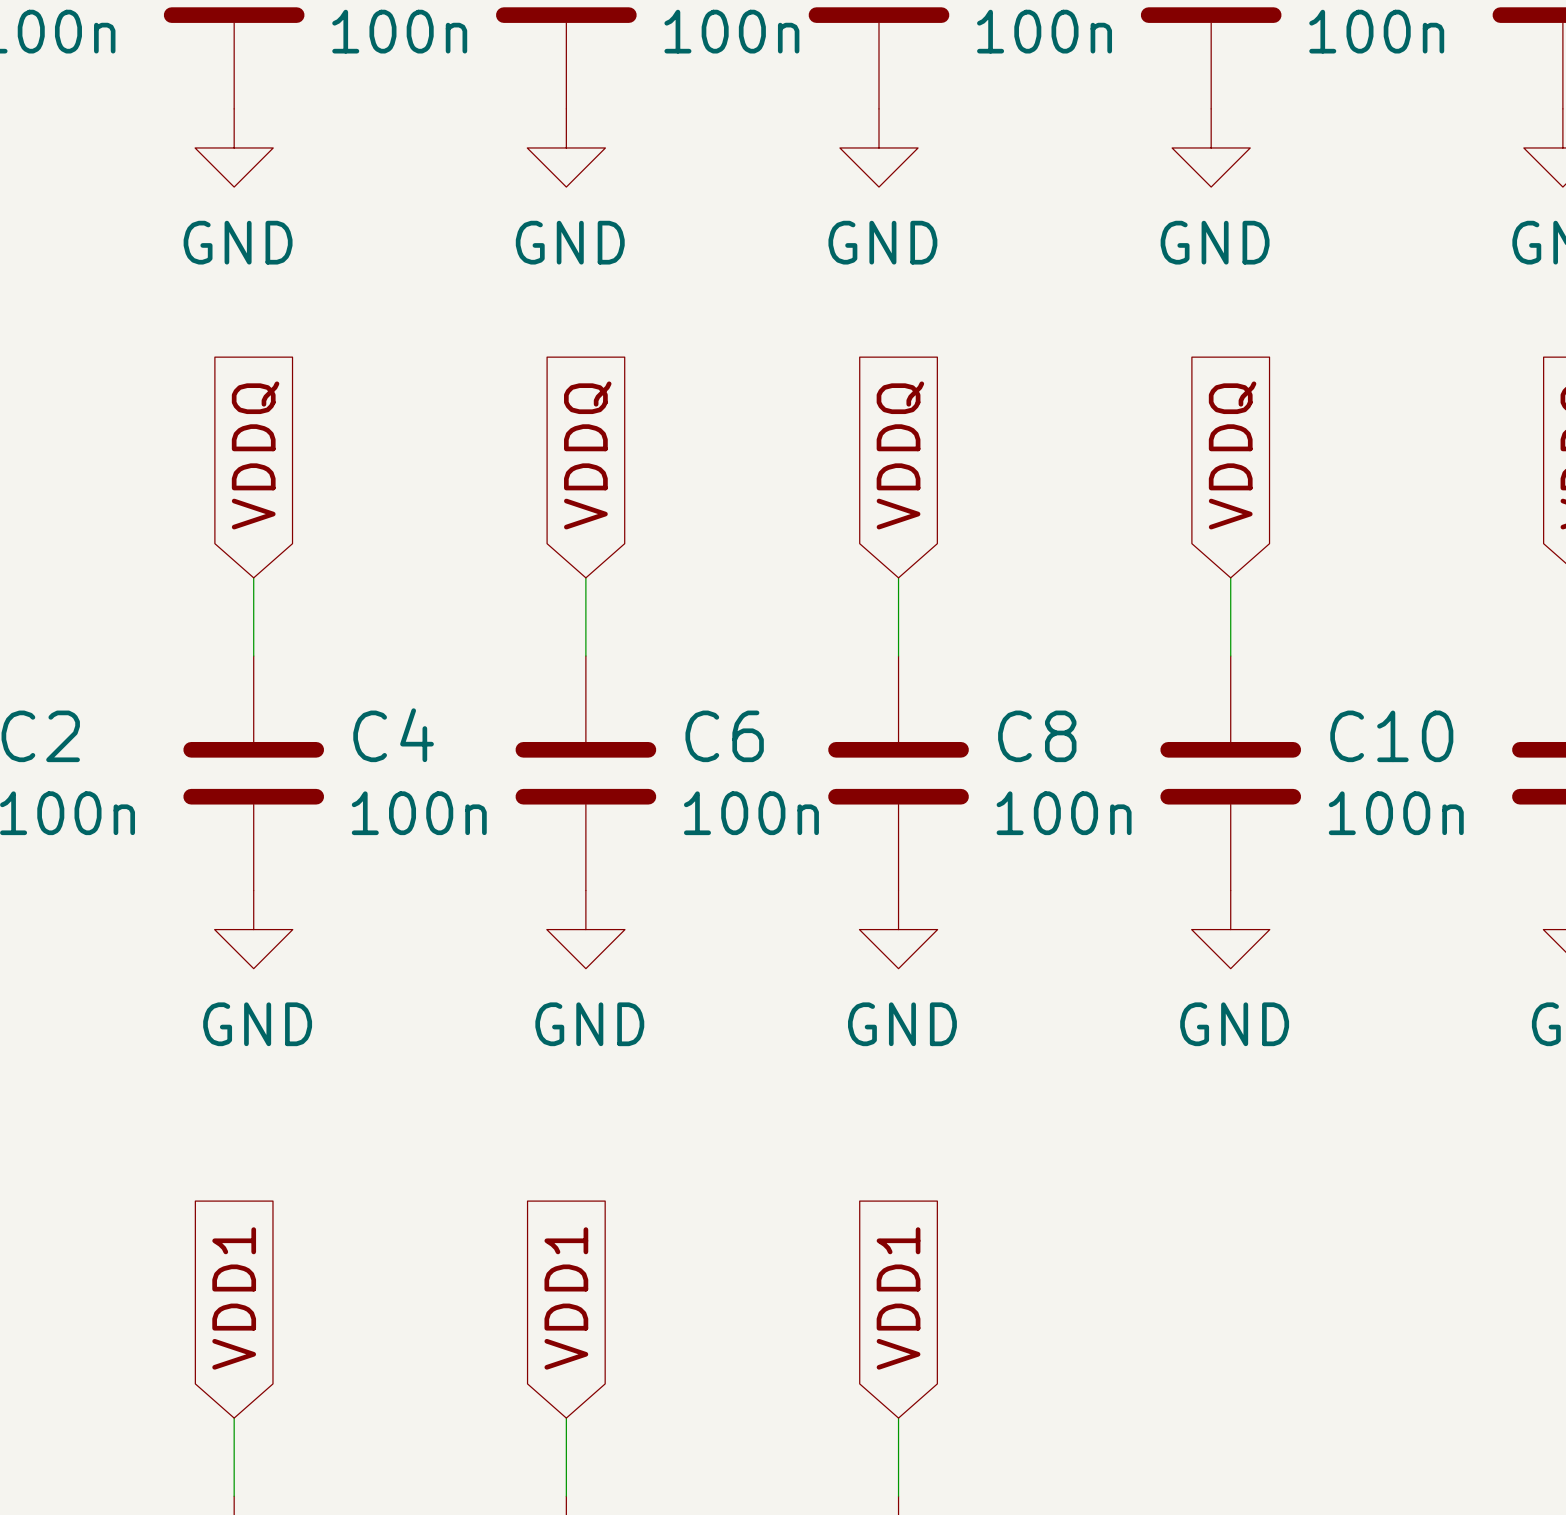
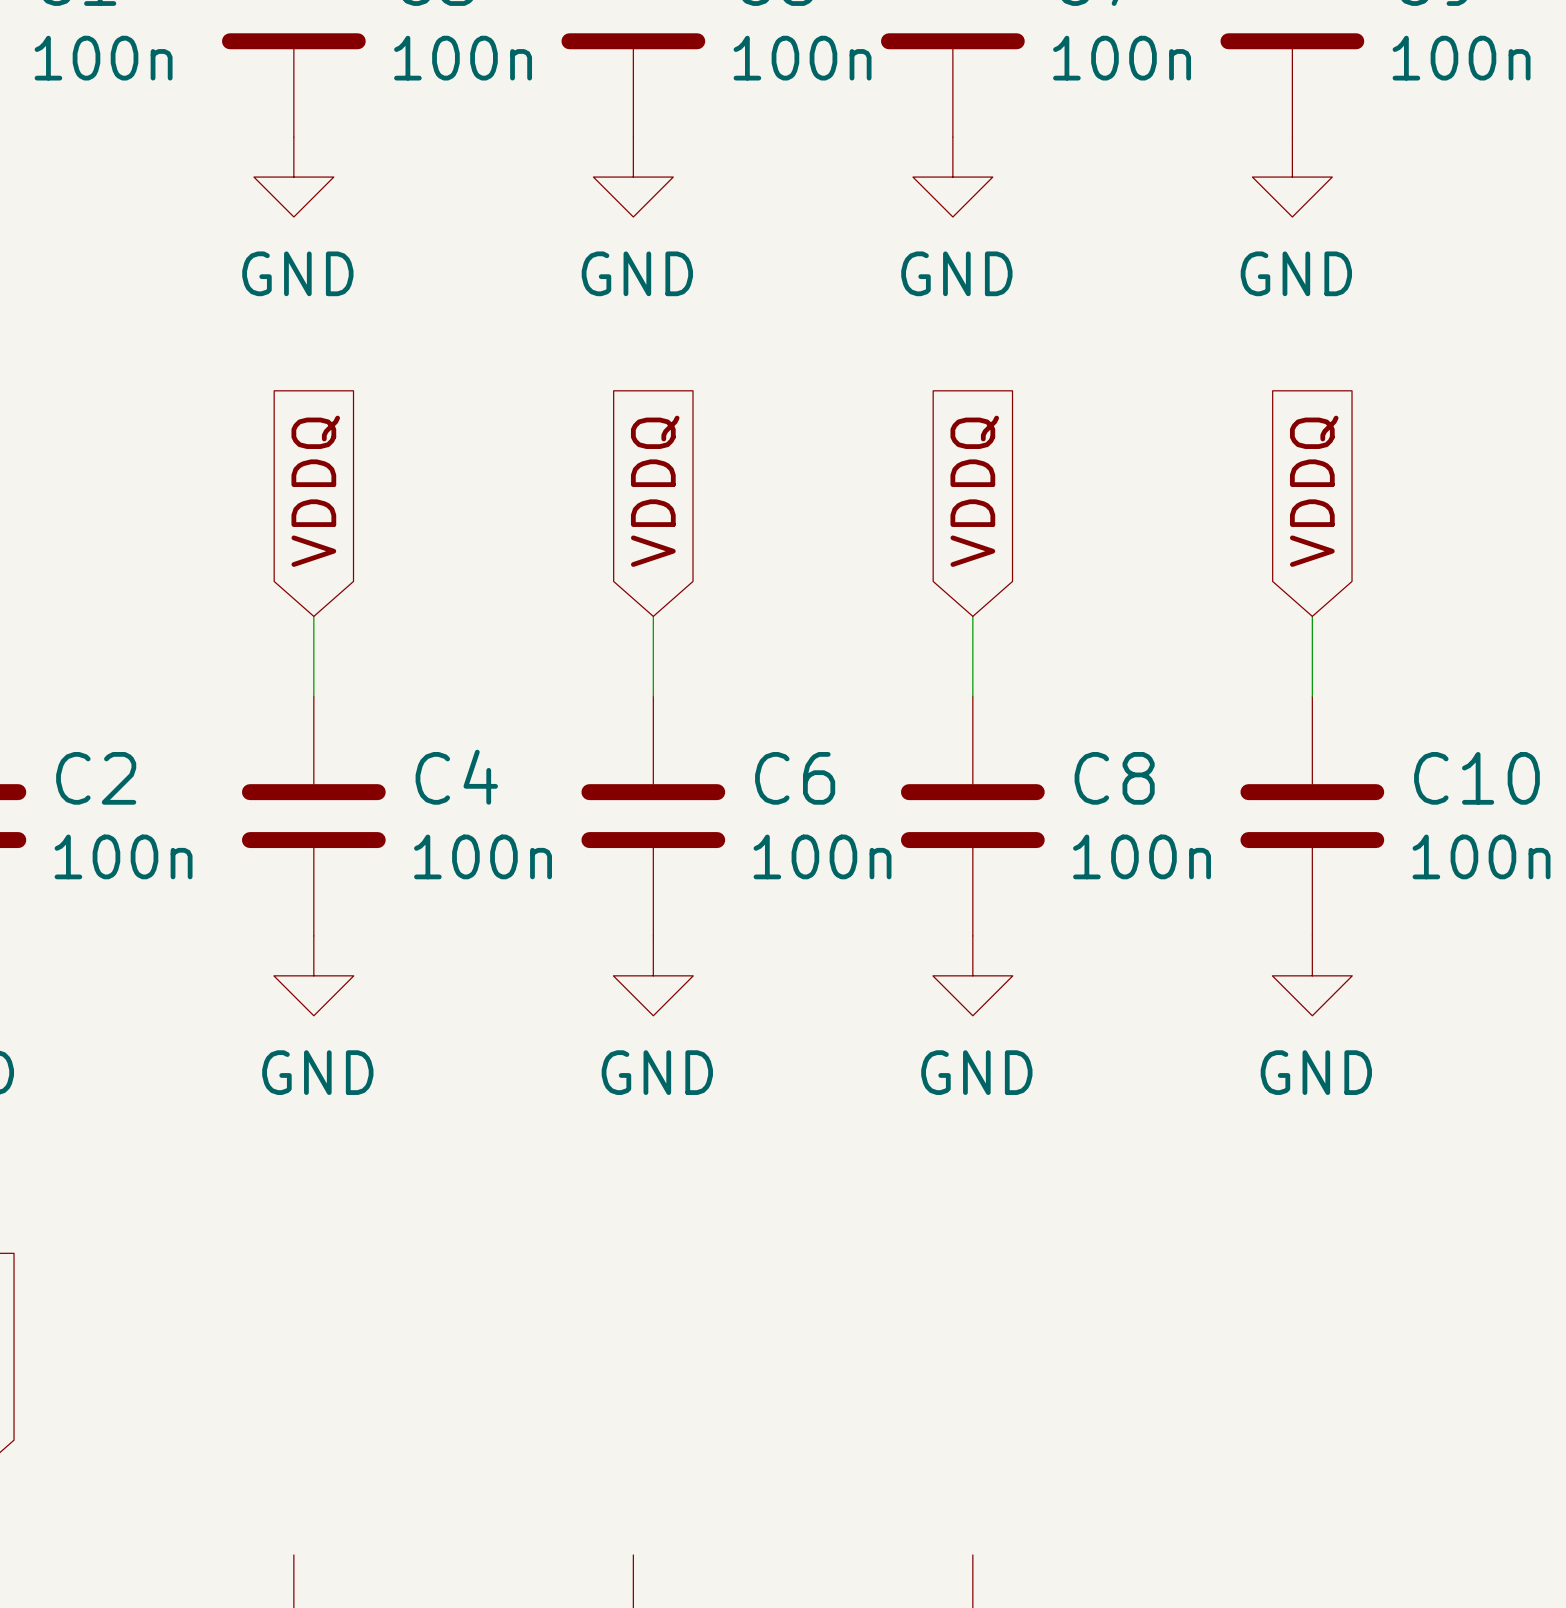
global label: VDD1 (234, 1298) -> none
global label: VDD1 (566, 1298) -> none
global label: VDD1 (898, 1298) -> none
wire: (234, 1418) (234, 1496) -> none
wire: (566, 1418) (566, 1496) -> none
wire: (898, 1418) (898, 1496) -> none

